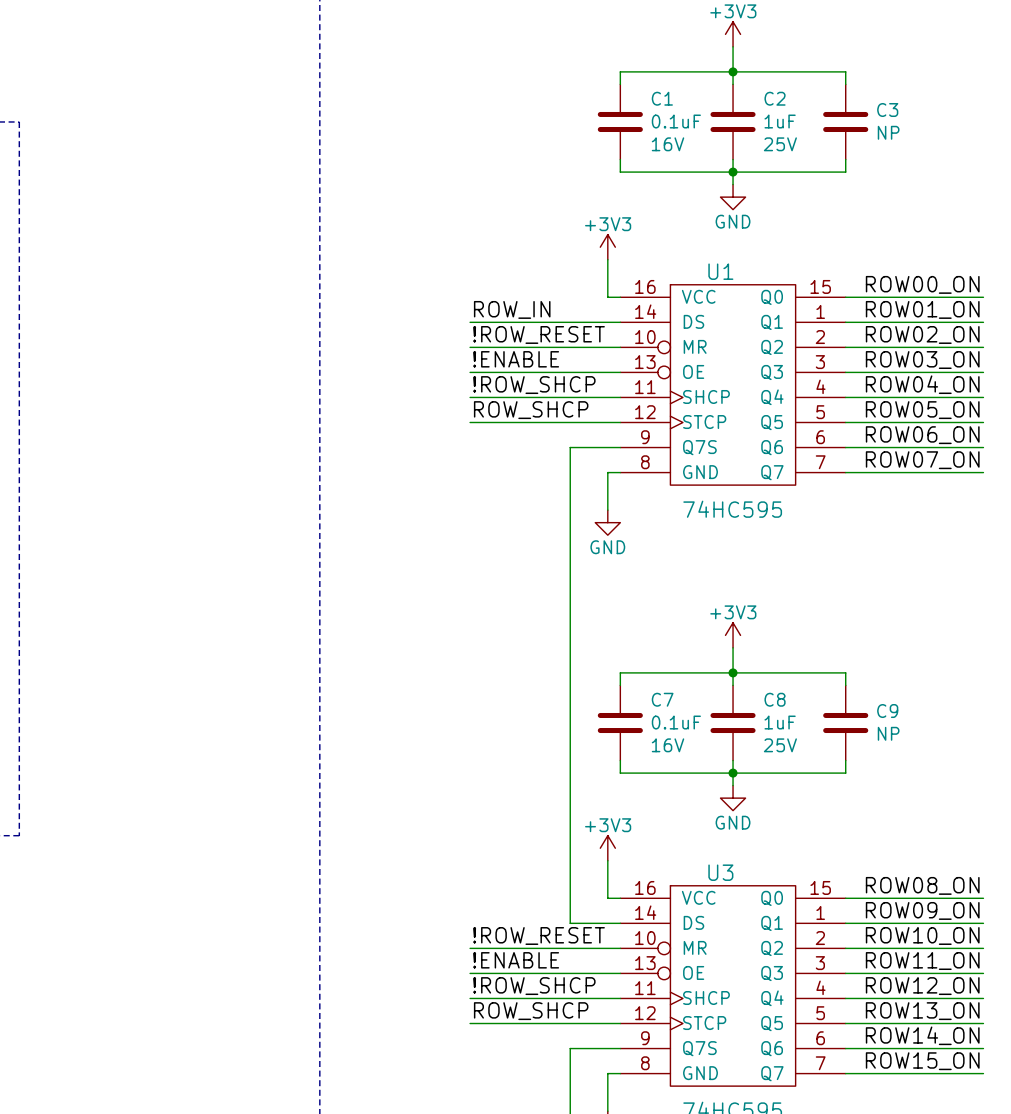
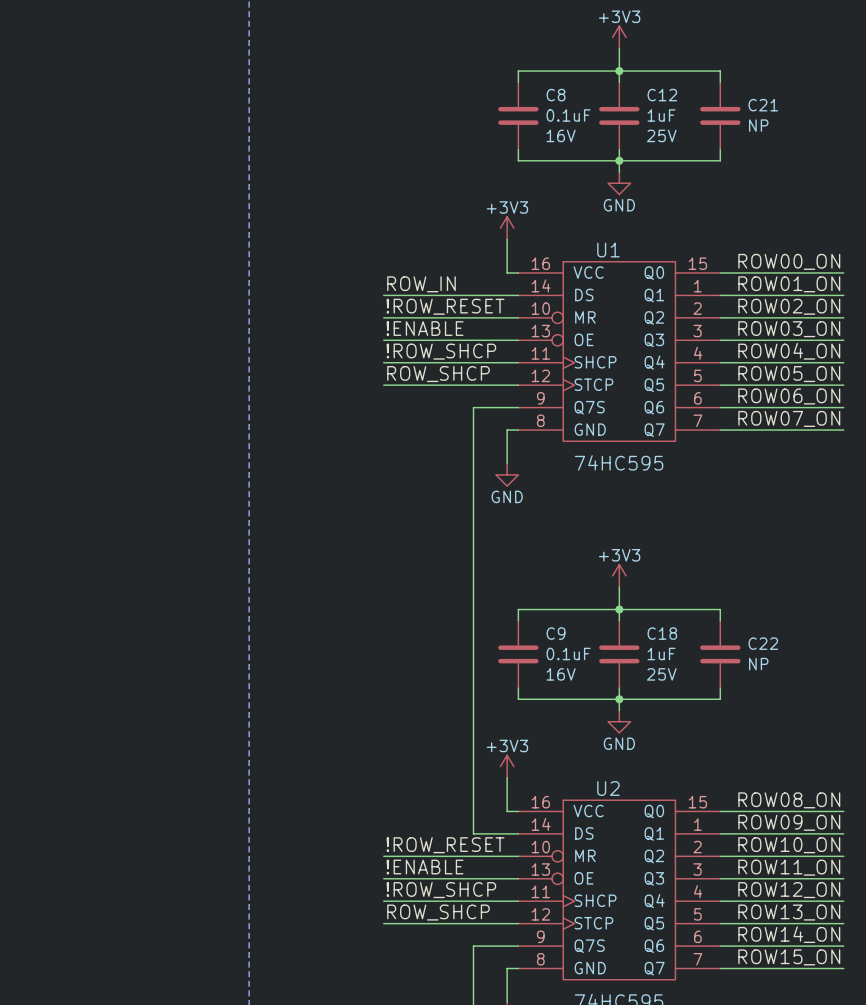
C1 name: C1 (662, 98) -> C8 (556, 95)
C2 name: C2 (775, 98) -> C12 (662, 95)
C3 name: C3 (887, 110) -> C21 (763, 105)
C7 name: C7 (662, 699) -> C9 (556, 633)
C8 name: C8 (775, 699) -> C18 (662, 633)
C9 name: C9 (887, 711) -> C22 (763, 643)
U3 name: U3 (720, 872) -> U2 (608, 788)

